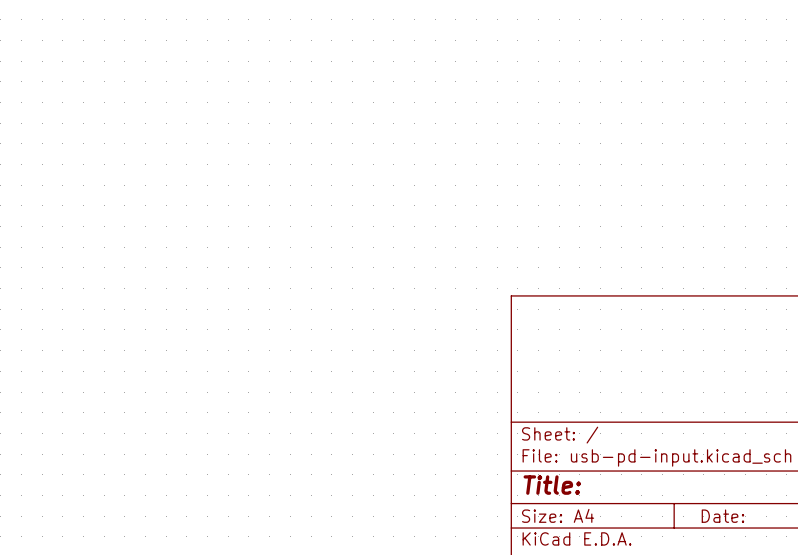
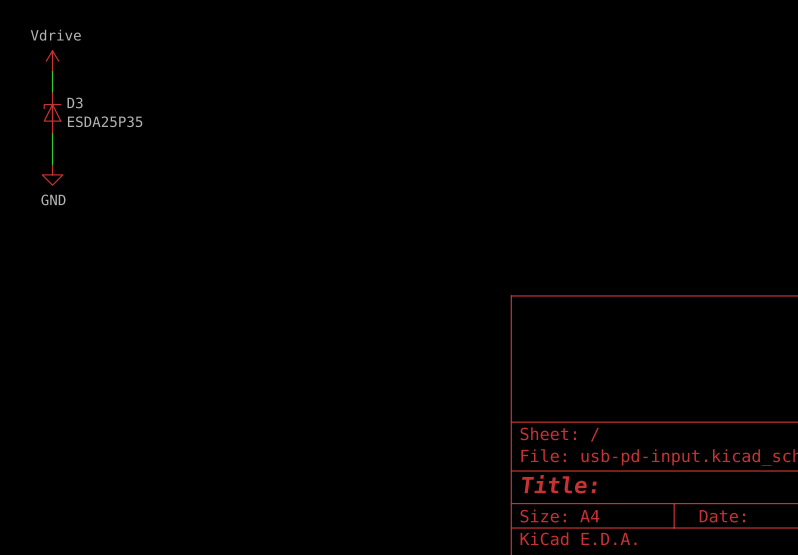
power symbol: none -> Vdrive (52, 61)
wire: none -> (52, 71) (52, 92)
D3: none -> (52, 112)
wire: none -> (52, 133) (52, 164)
power symbol: none -> GND (52, 174)

